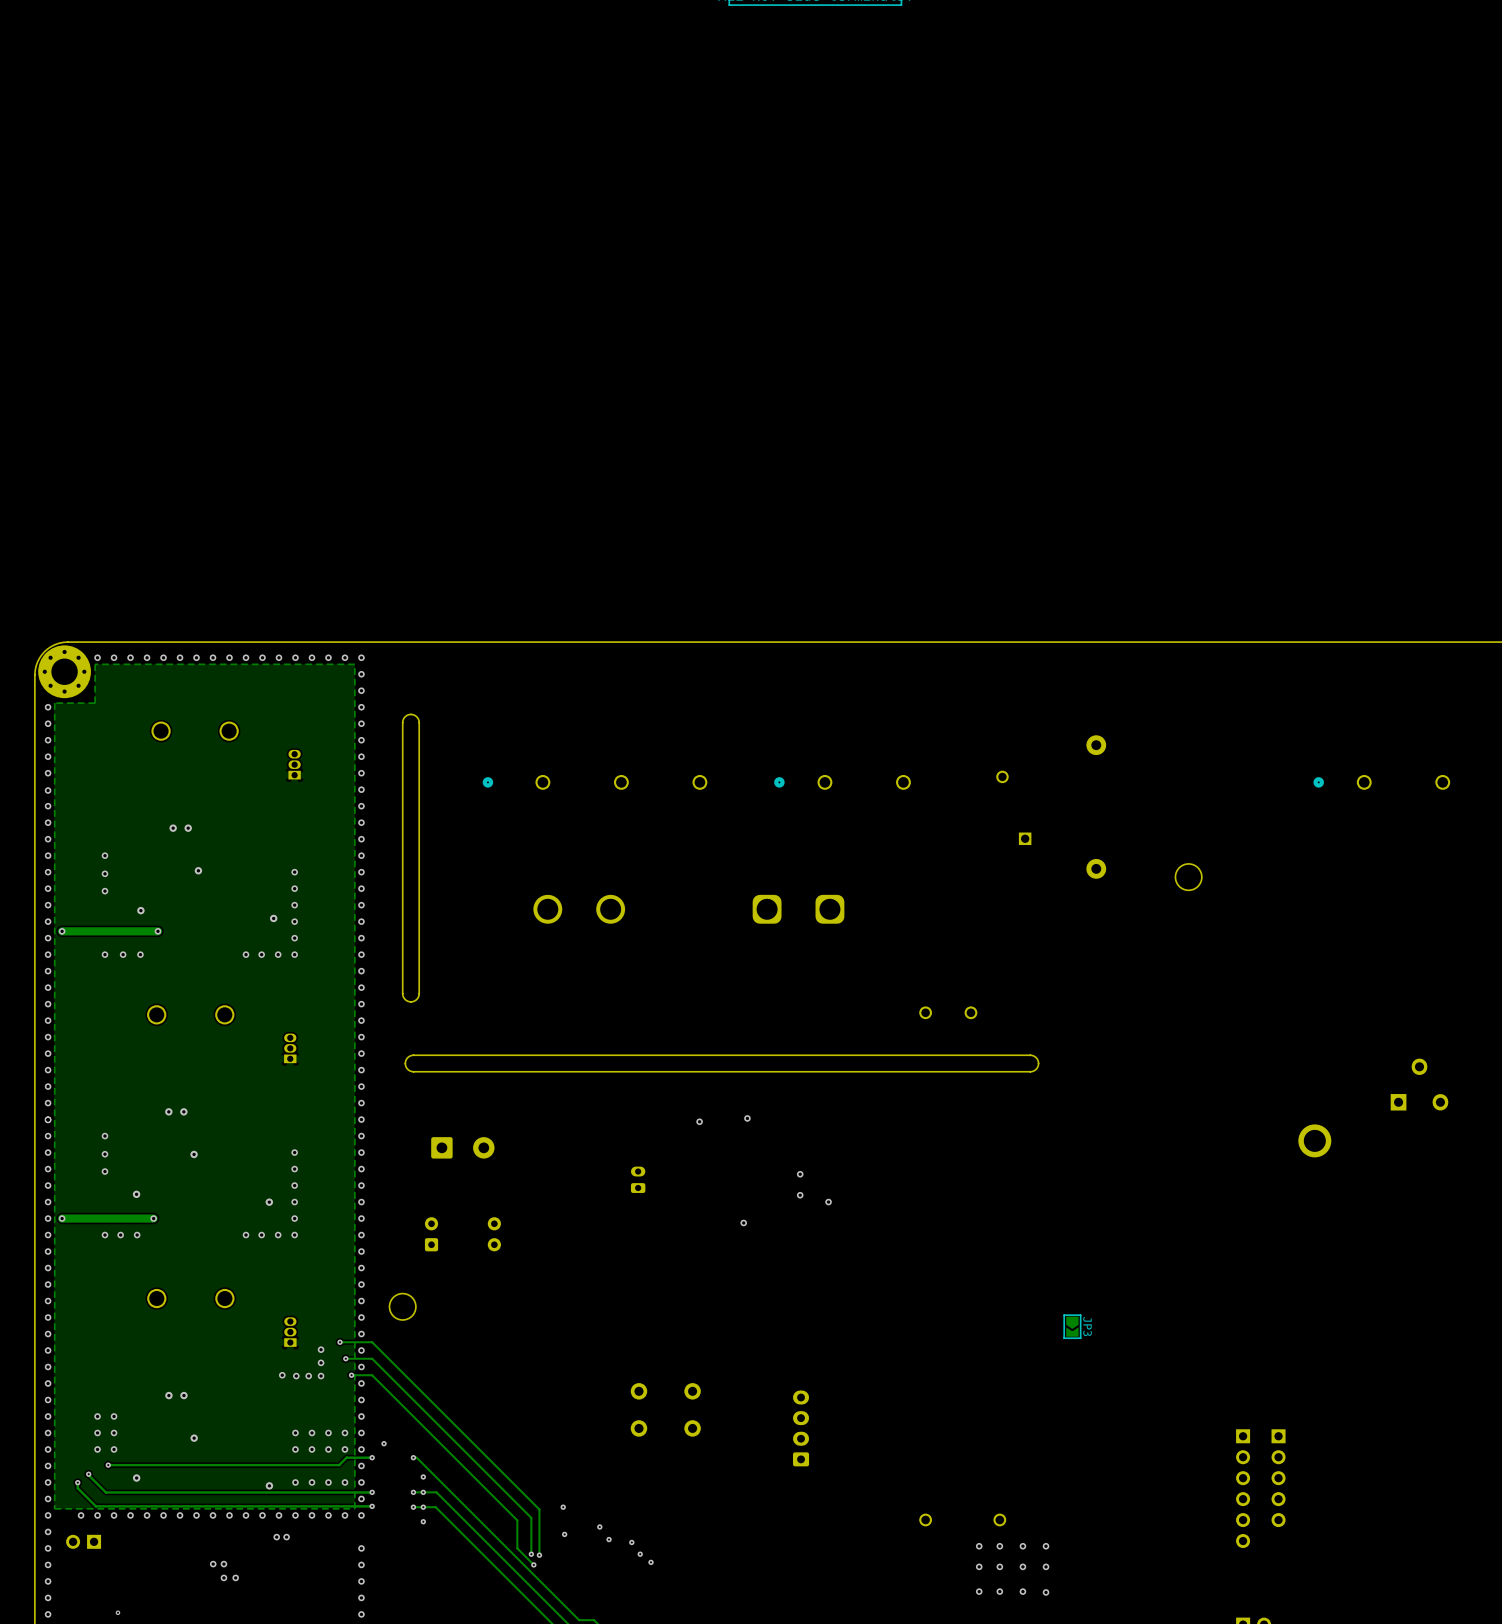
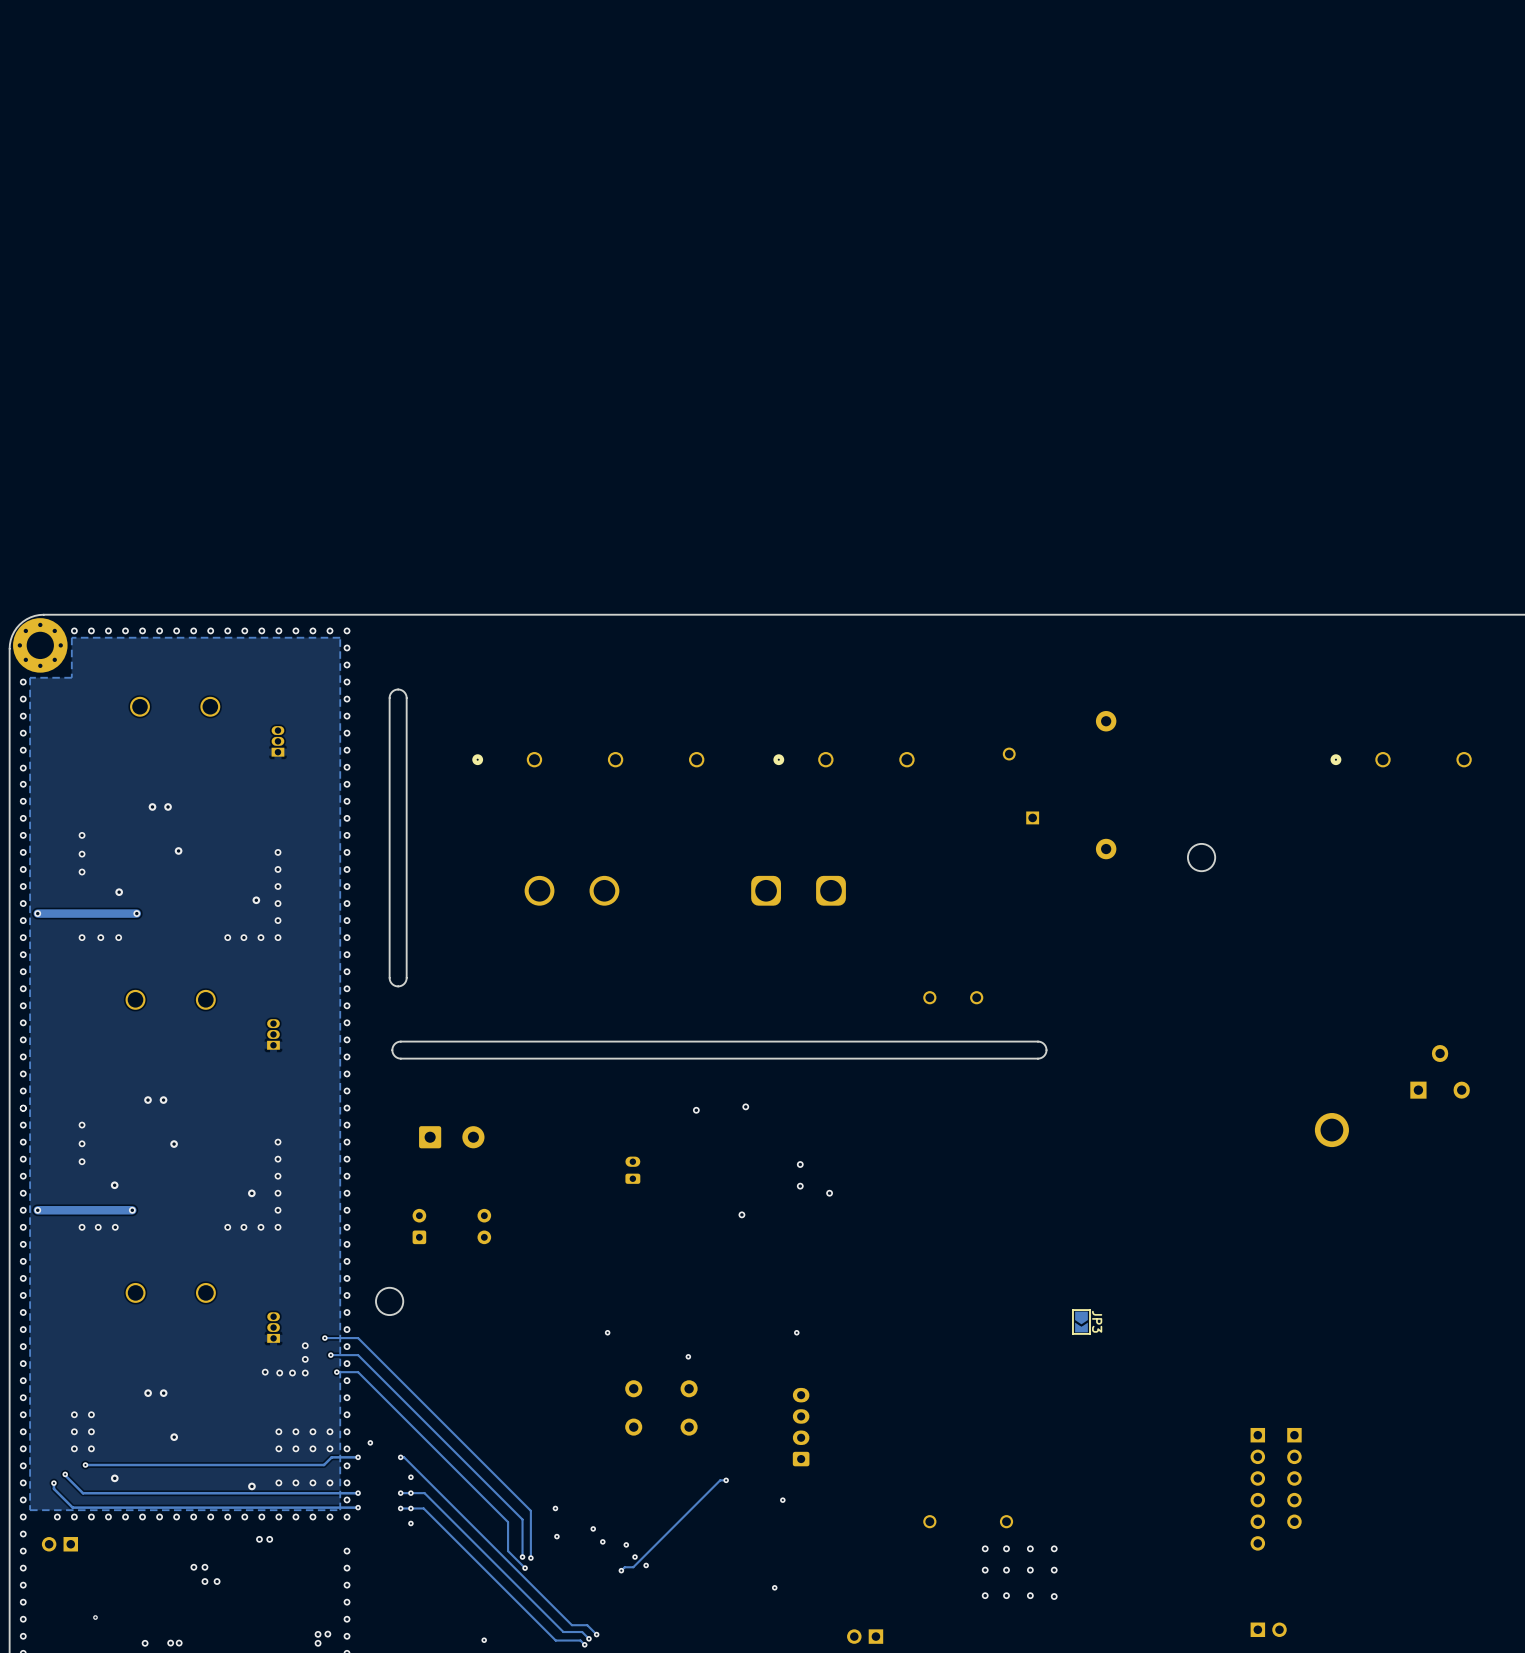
via: none -> (607, 1332)
via: none -> (796, 1332)
via: none -> (688, 1356)
track: none -> (726, 1480) (720, 1480) (633, 1567) (624, 1567) (621, 1570)
via: none -> (726, 1480)
via: none -> (782, 1500)
via: none -> (621, 1570)
via: none -> (774, 1587)

